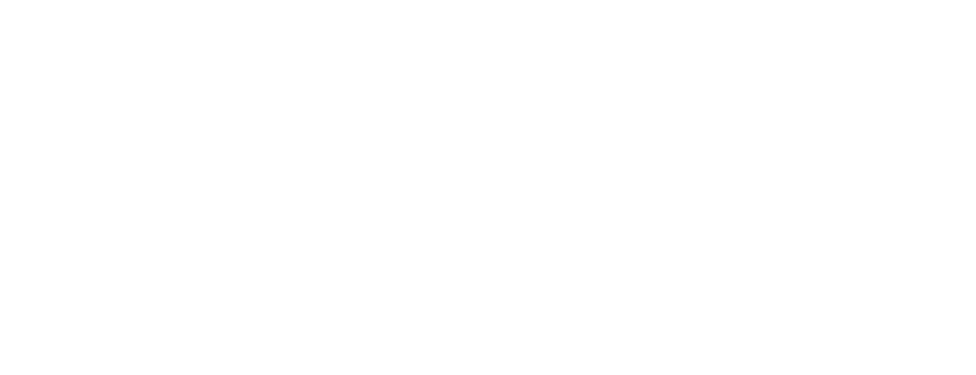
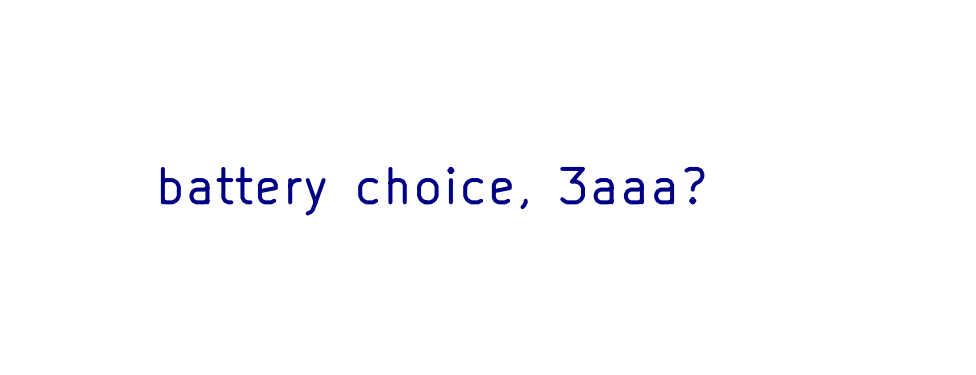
text: none -> battery choice, 3aaa? (432, 191)

